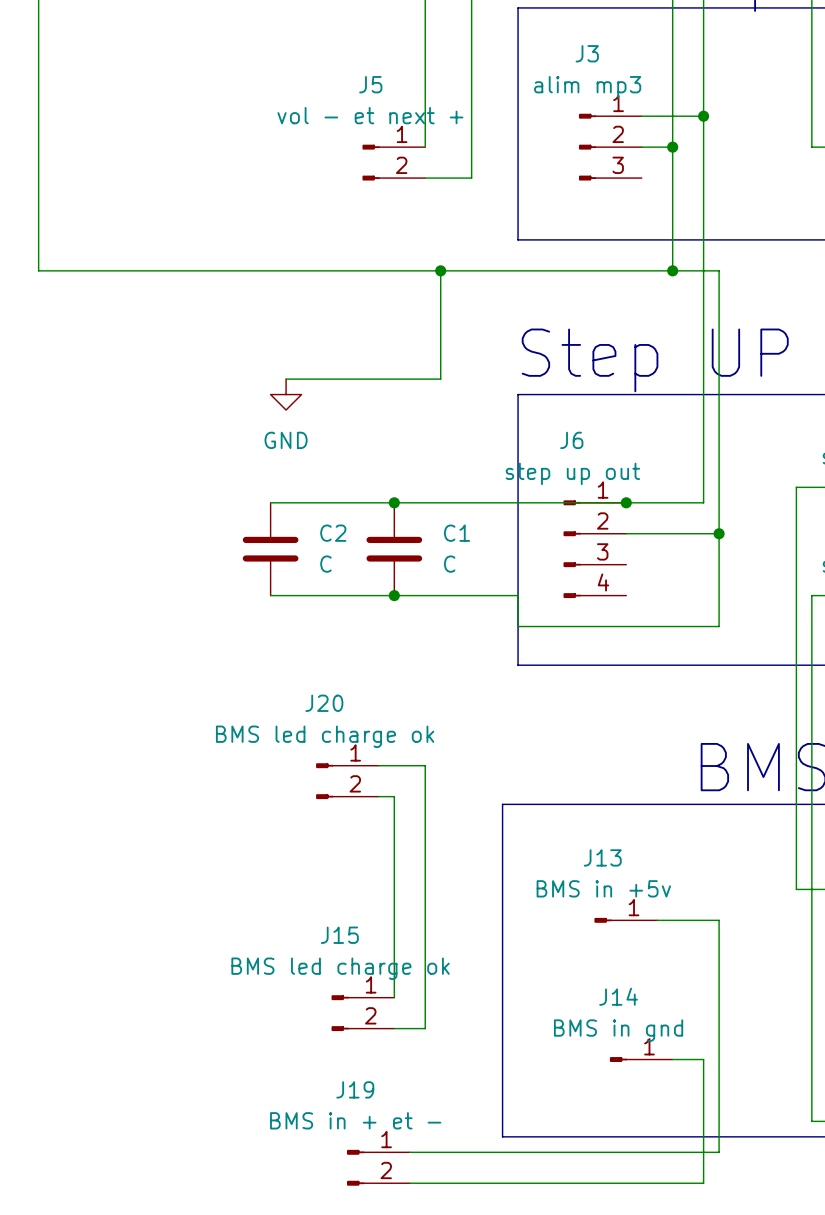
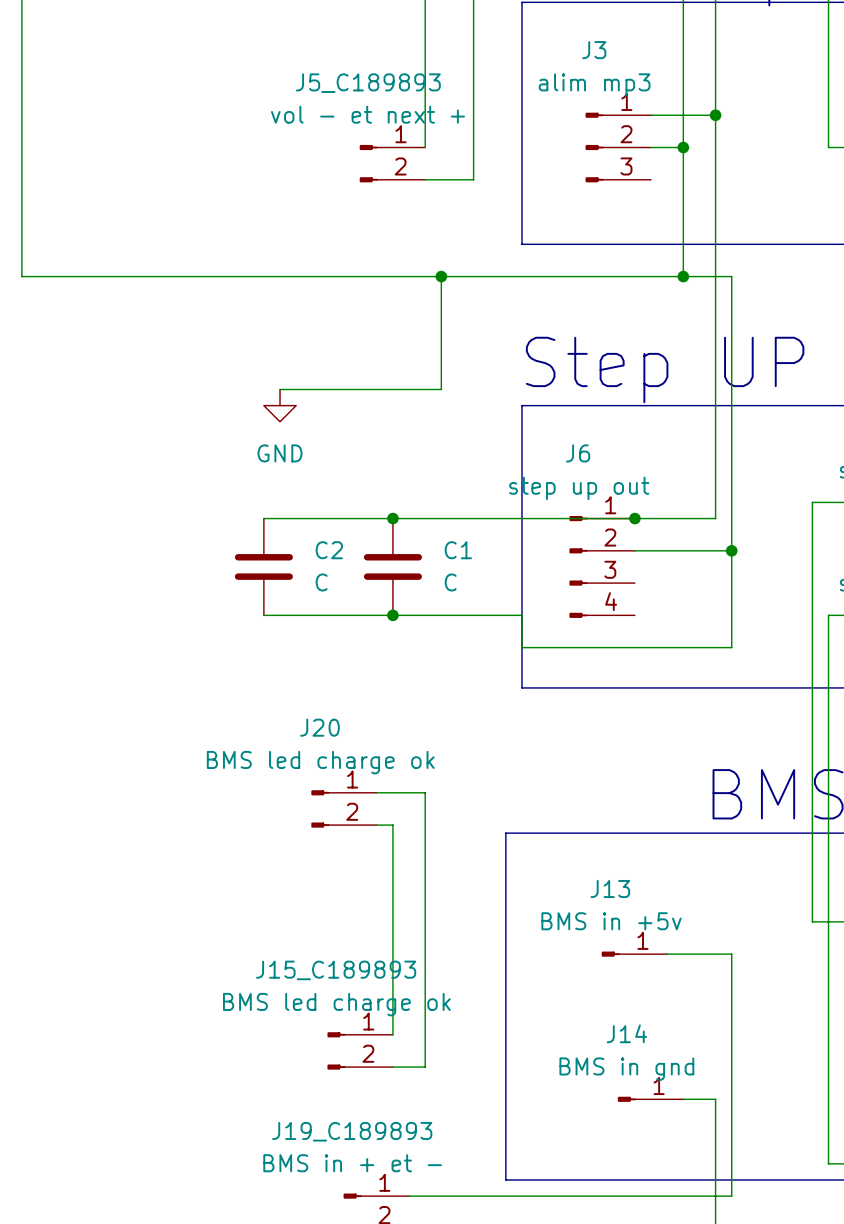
J5 name: J5 (370, 84) -> J5_C189893 (368, 83)
J15 name: J15 (339, 935) -> J15_C189893 (336, 970)
J19 name: J19 (355, 1089) -> J19_C189893 (352, 1131)

